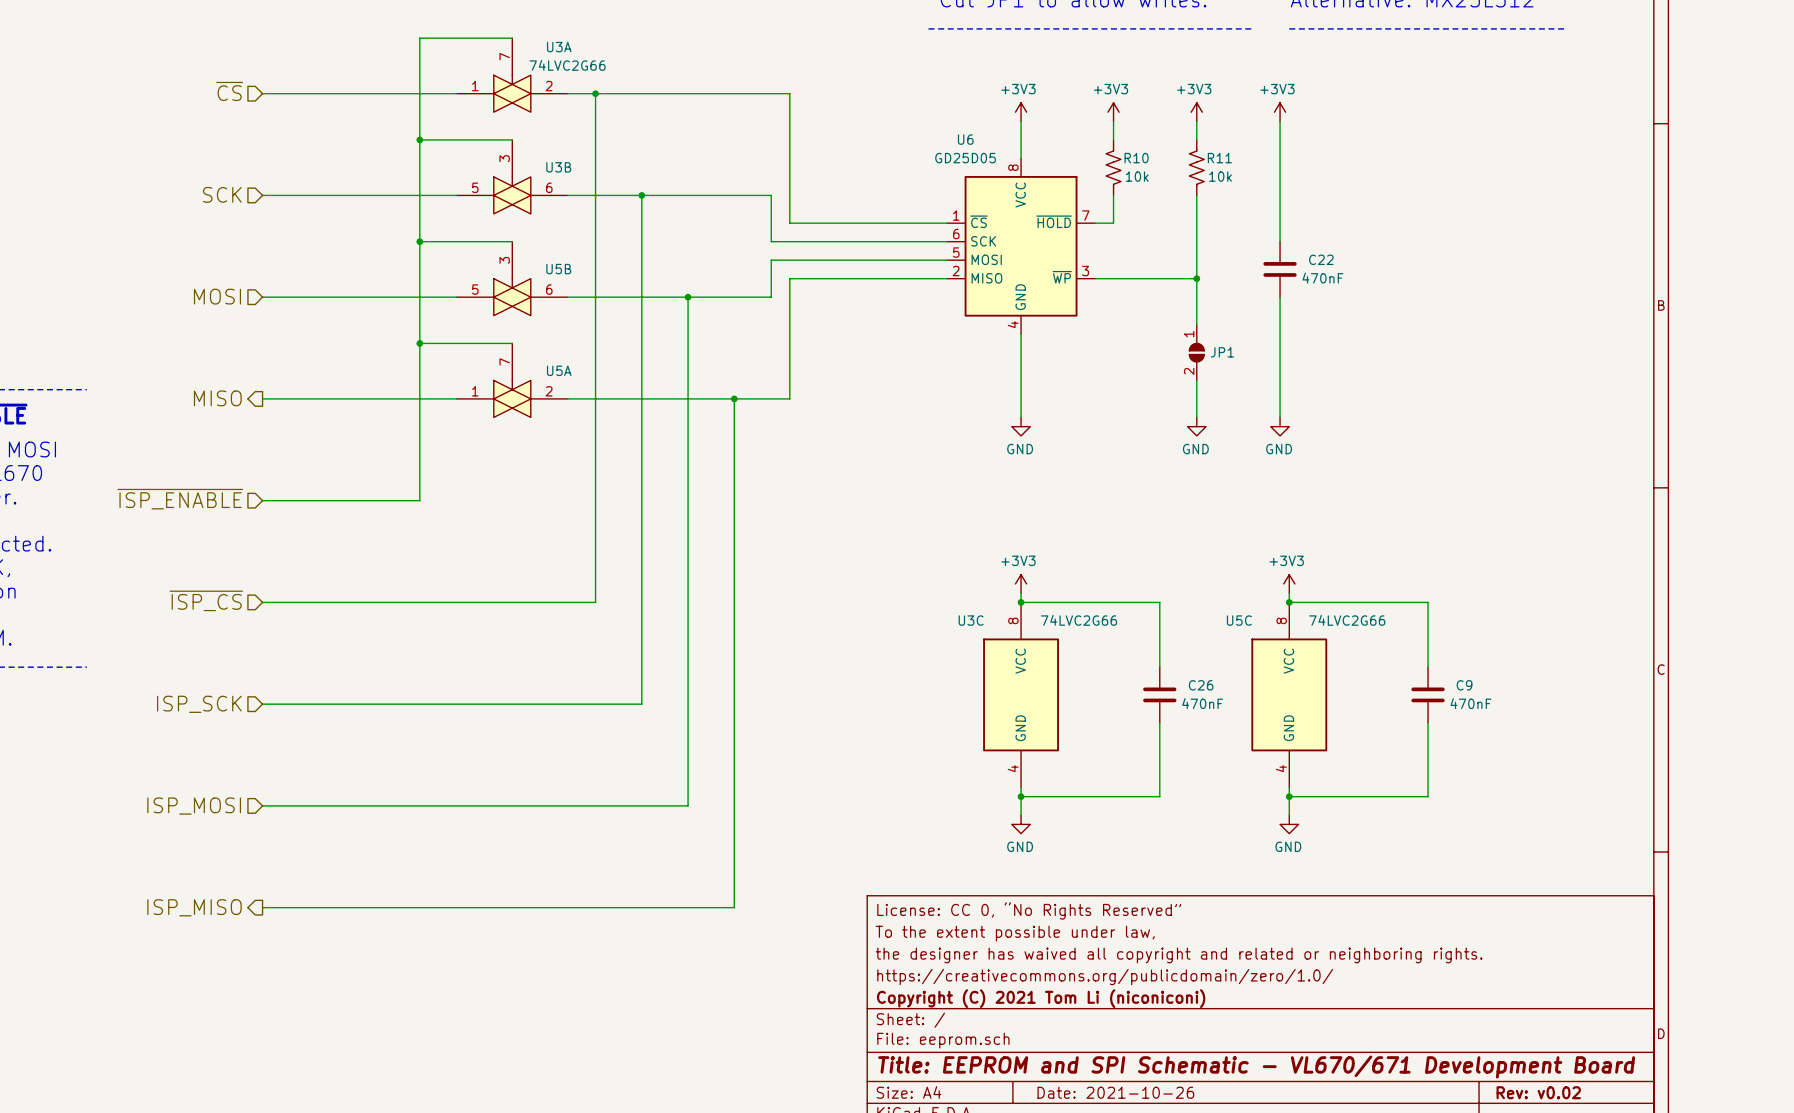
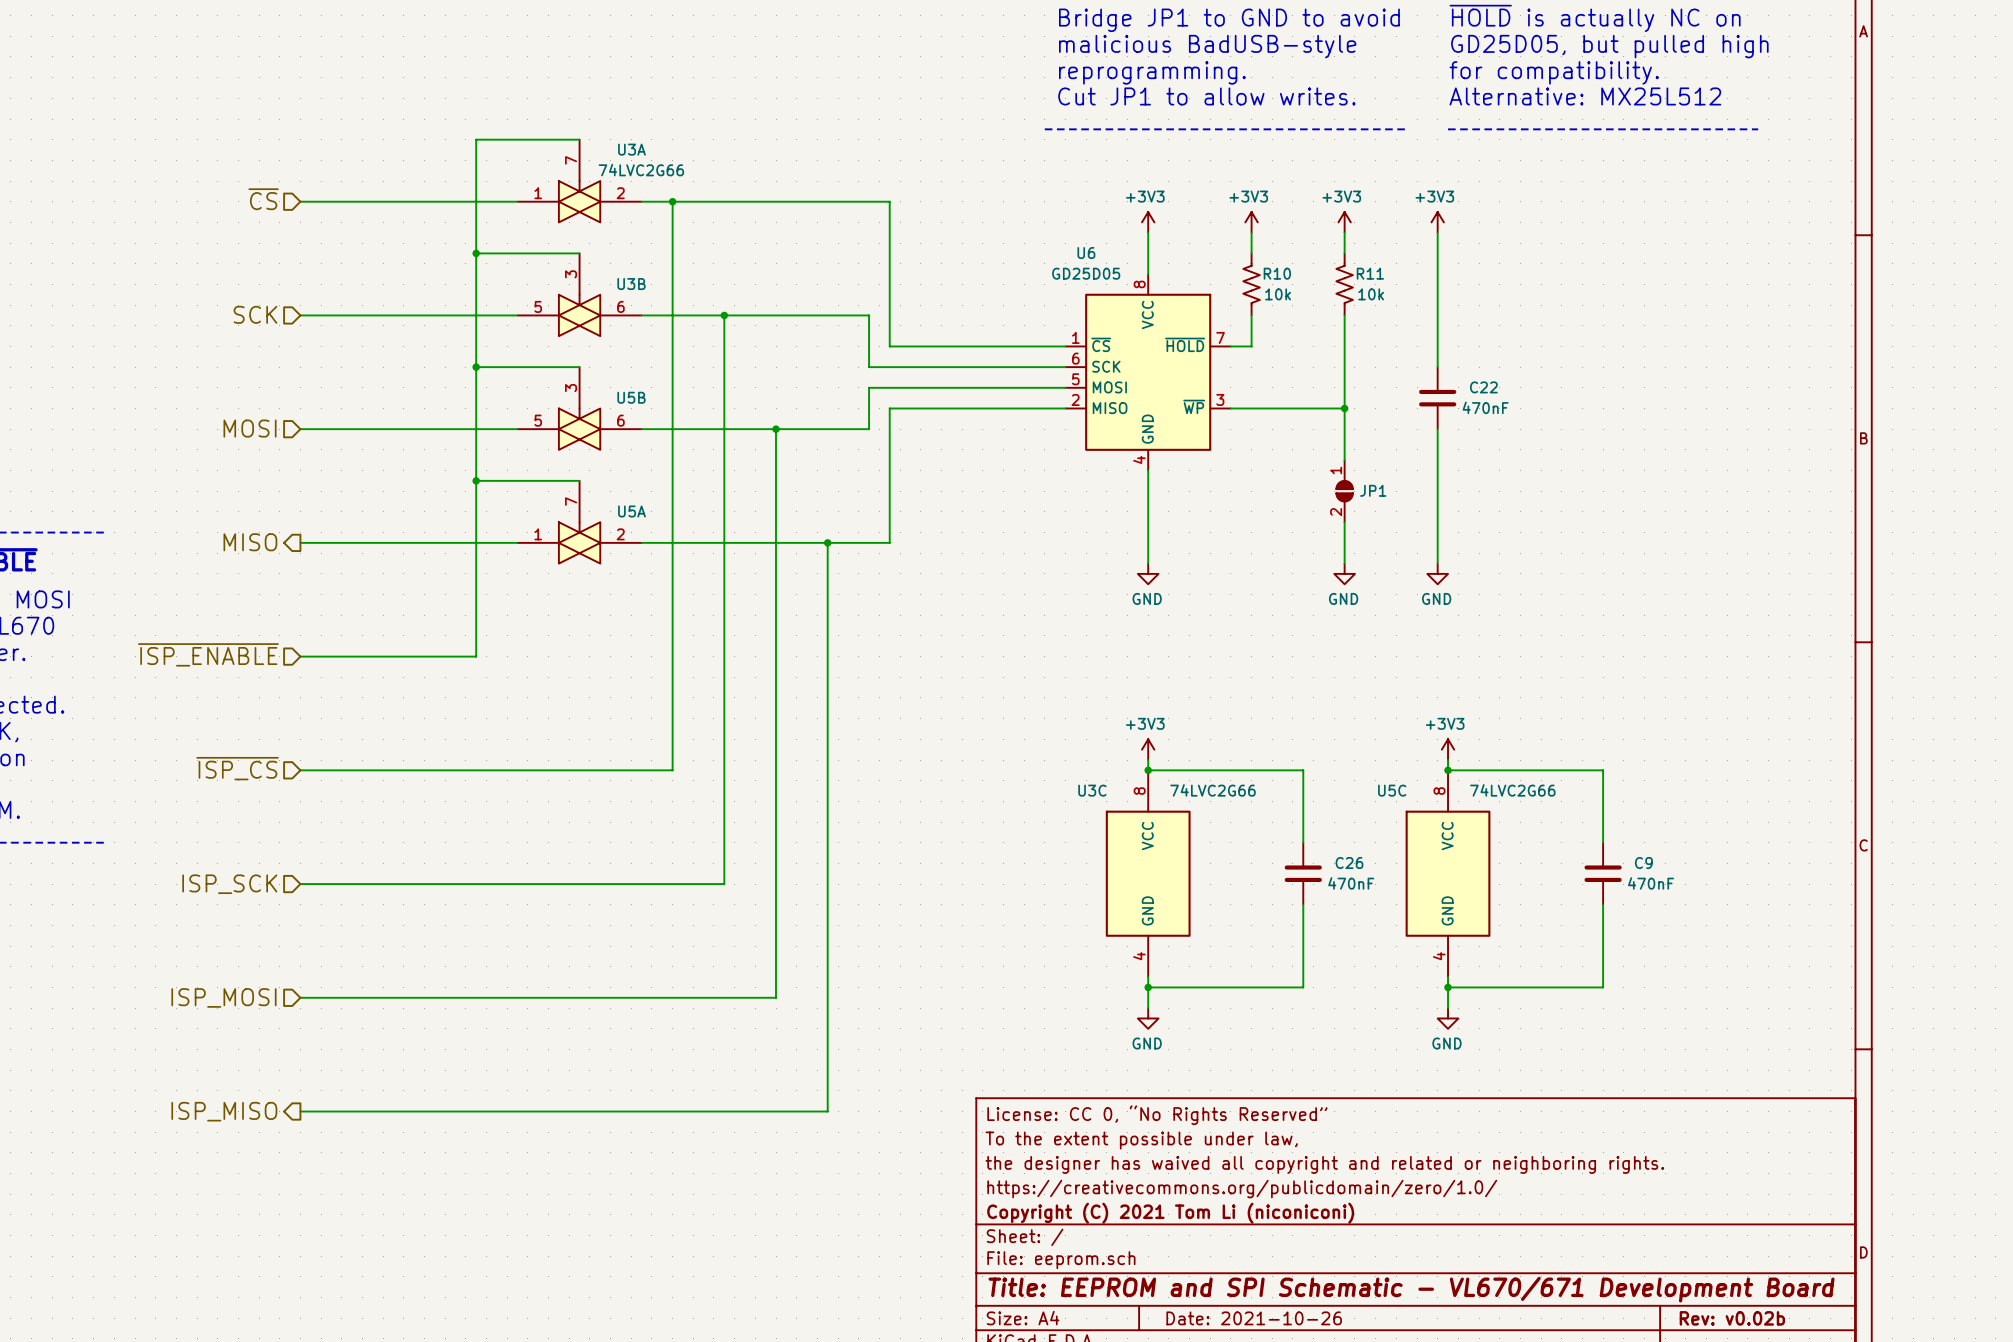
title block: Rev: v0.02 (1538, 1092) -> Rev: v0.02b (1732, 1318)

